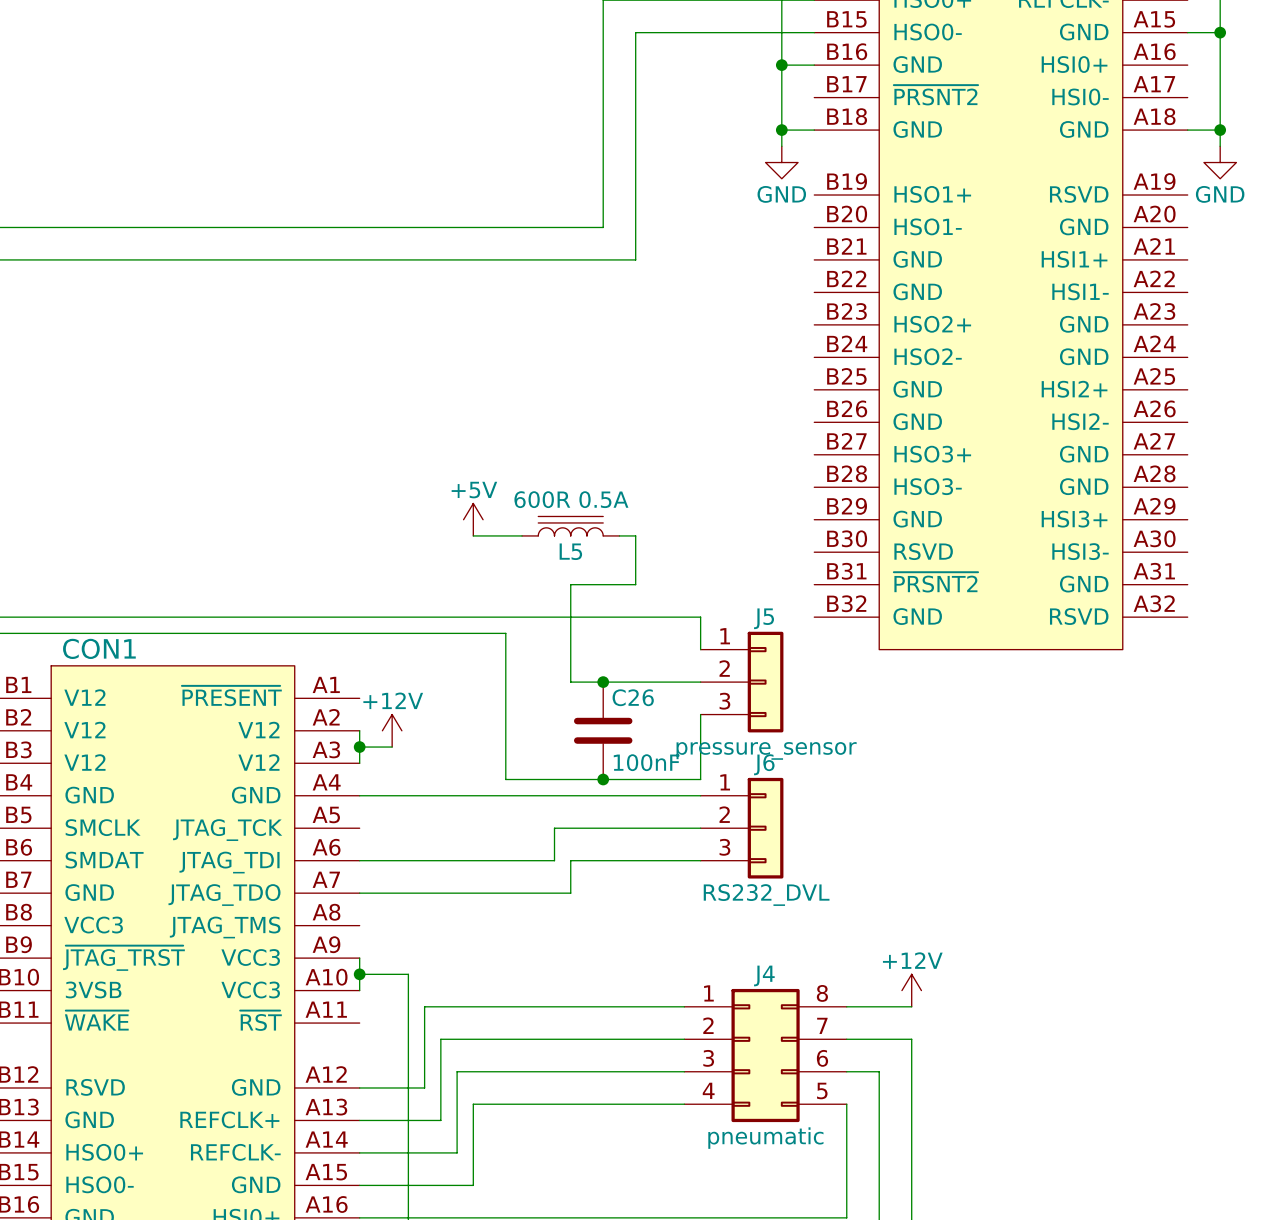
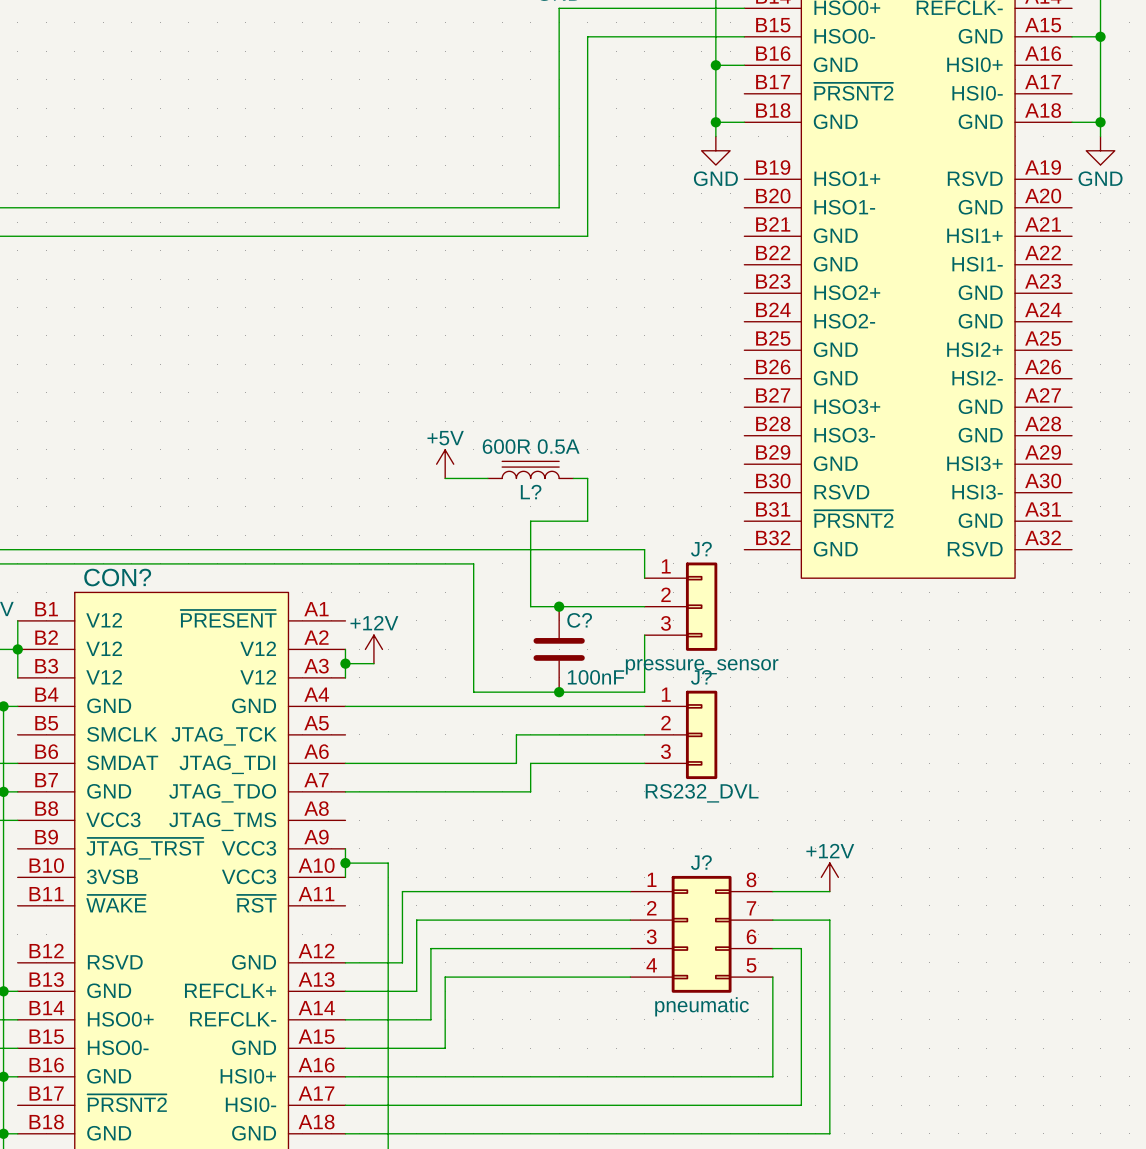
L5 name: L5 (570, 551) -> L? (531, 492)
J5 name: J5 (764, 618) -> J? (701, 549)
CON1 name: CON1 (99, 648) -> CON? (117, 577)
C26 name: C26 (633, 697) -> C? (579, 620)
J6 name: J6 (764, 764) -> J? (701, 677)
J4 name: J4 (764, 975) -> J? (701, 862)

